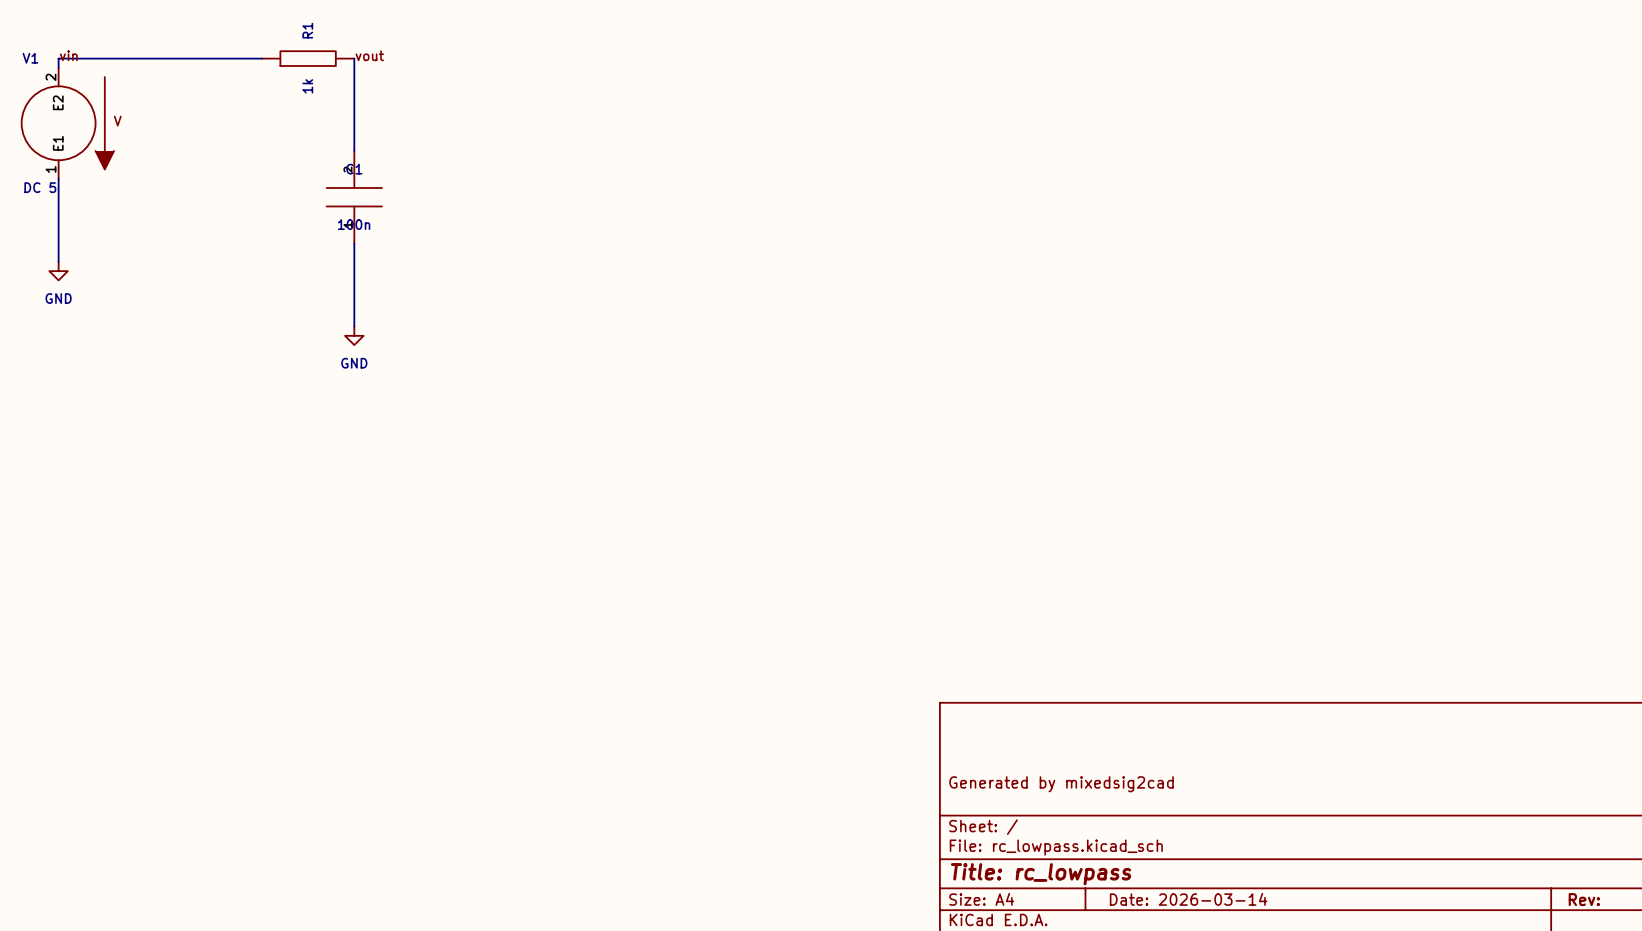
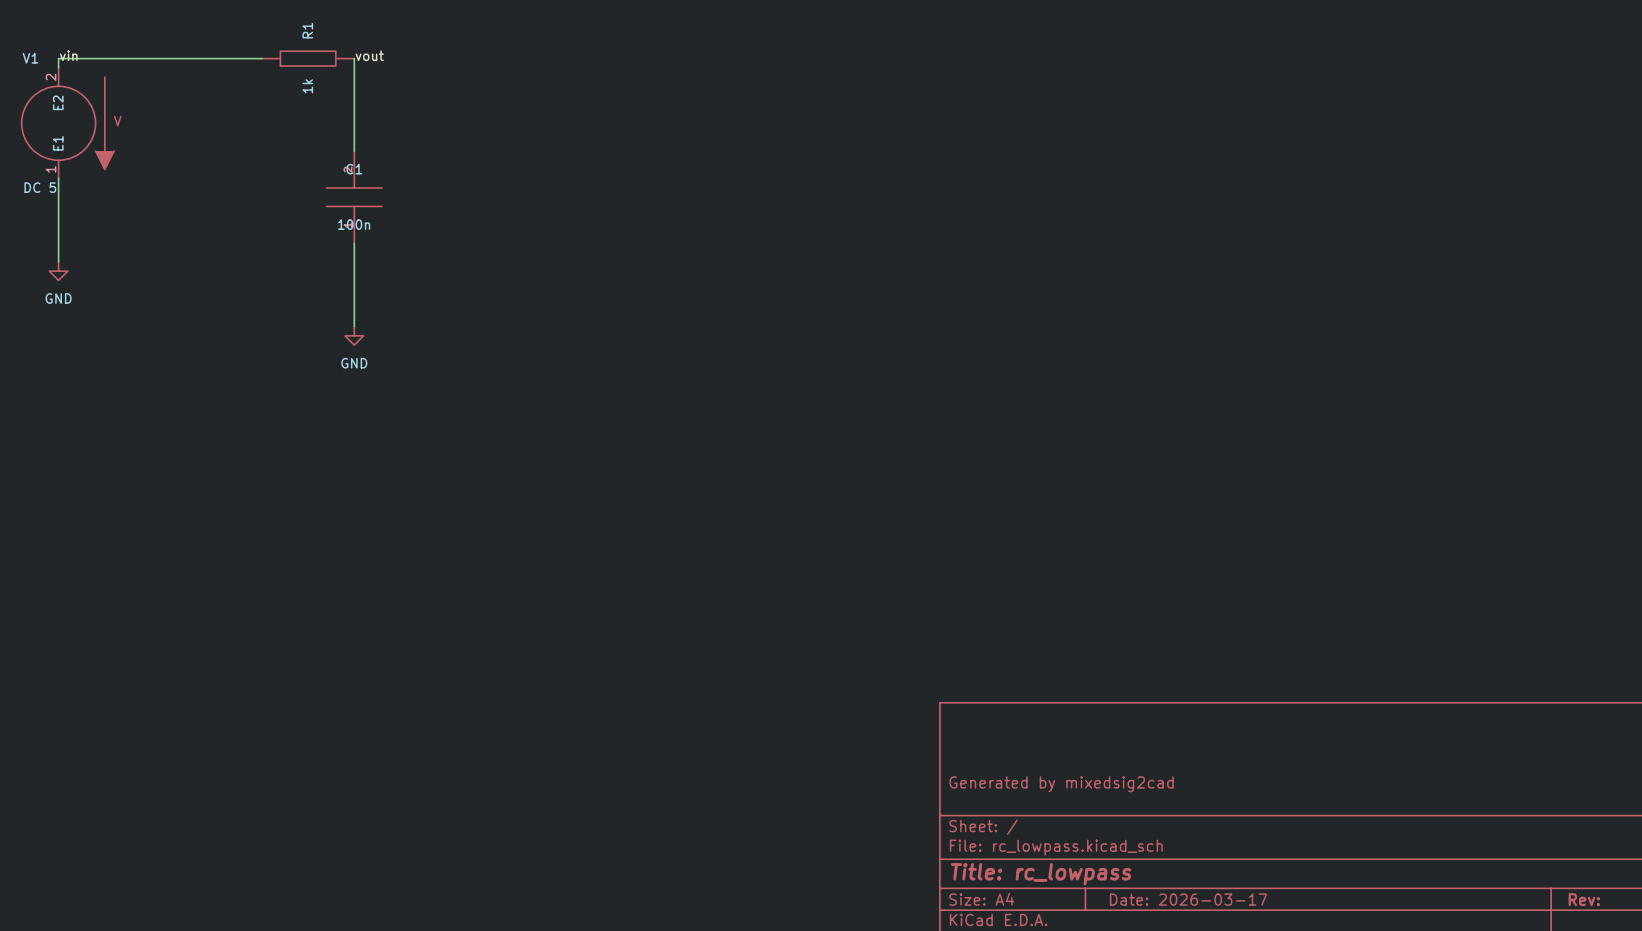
title block: Date: 2026-03-14 (1188, 899) -> Date: 2026-03-17 (1188, 899)

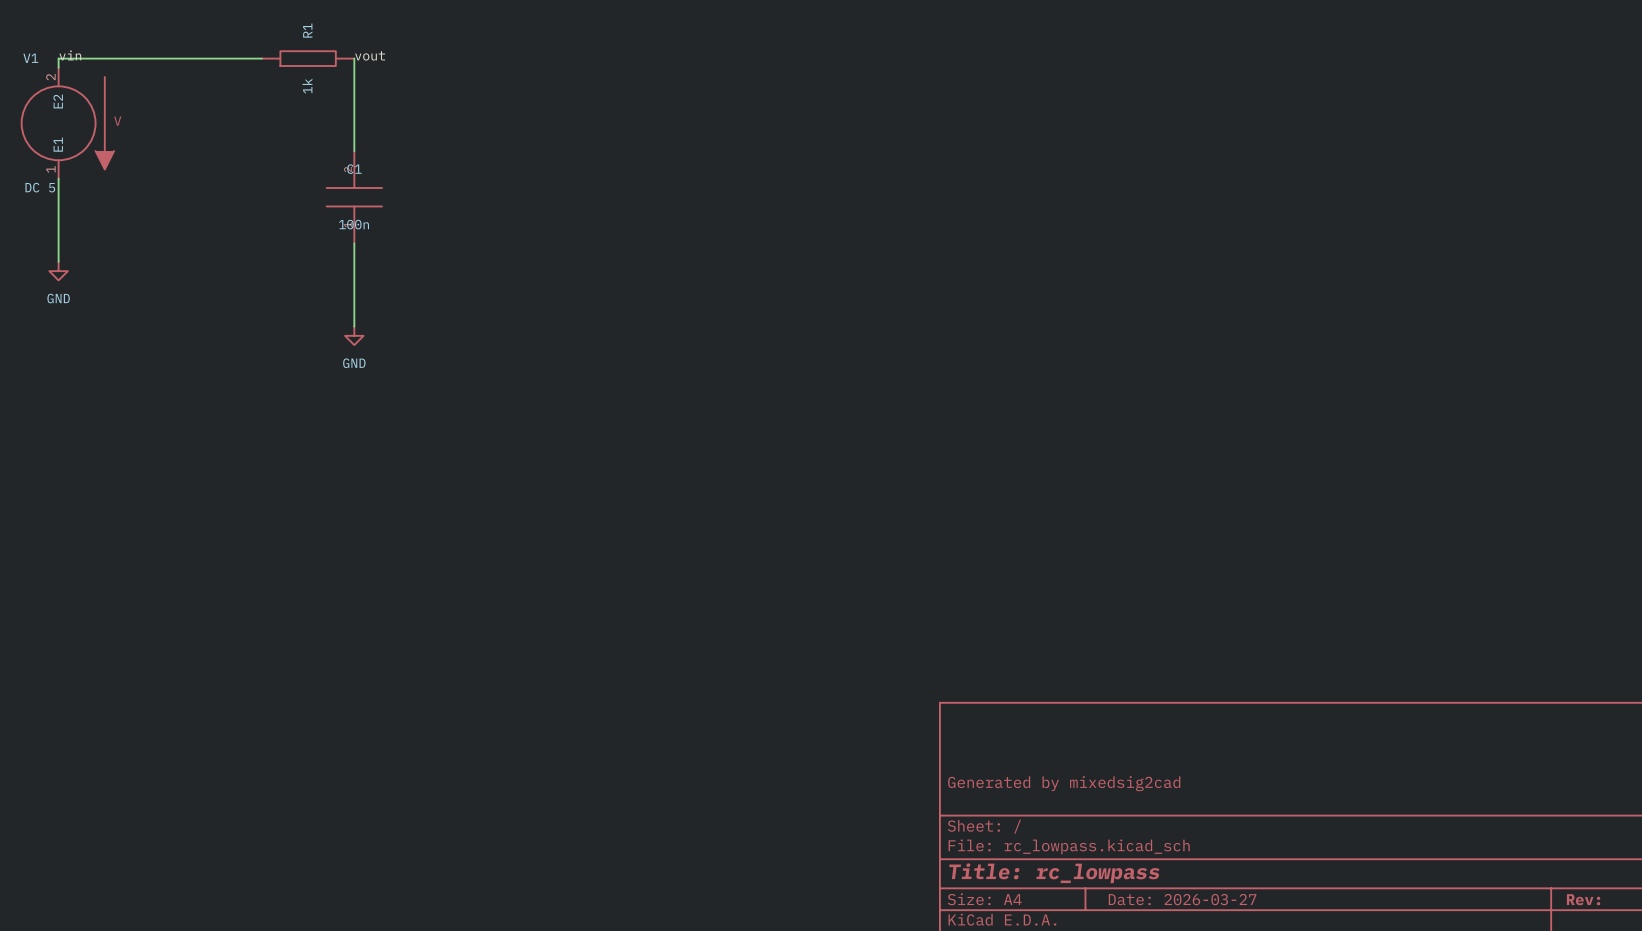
title block: Date: 2026-03-17 (1188, 899) -> Date: 2026-03-27 (1182, 899)

